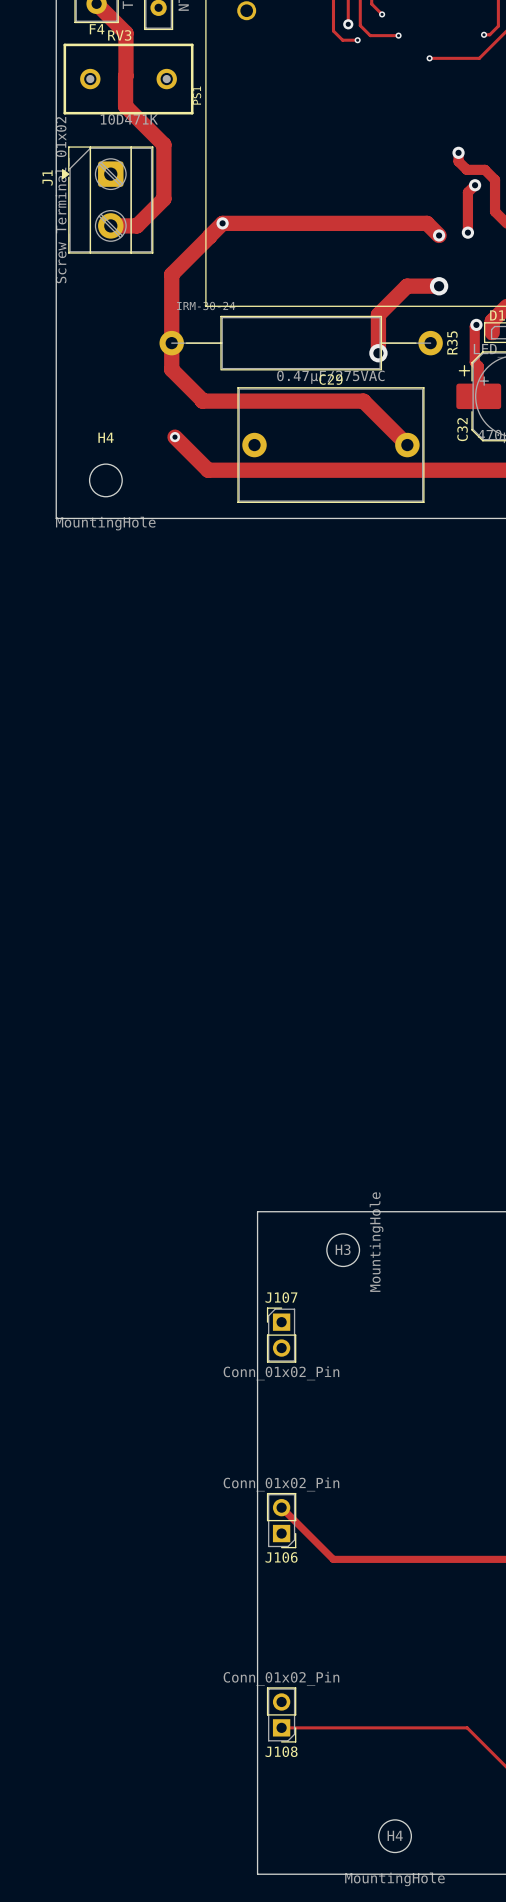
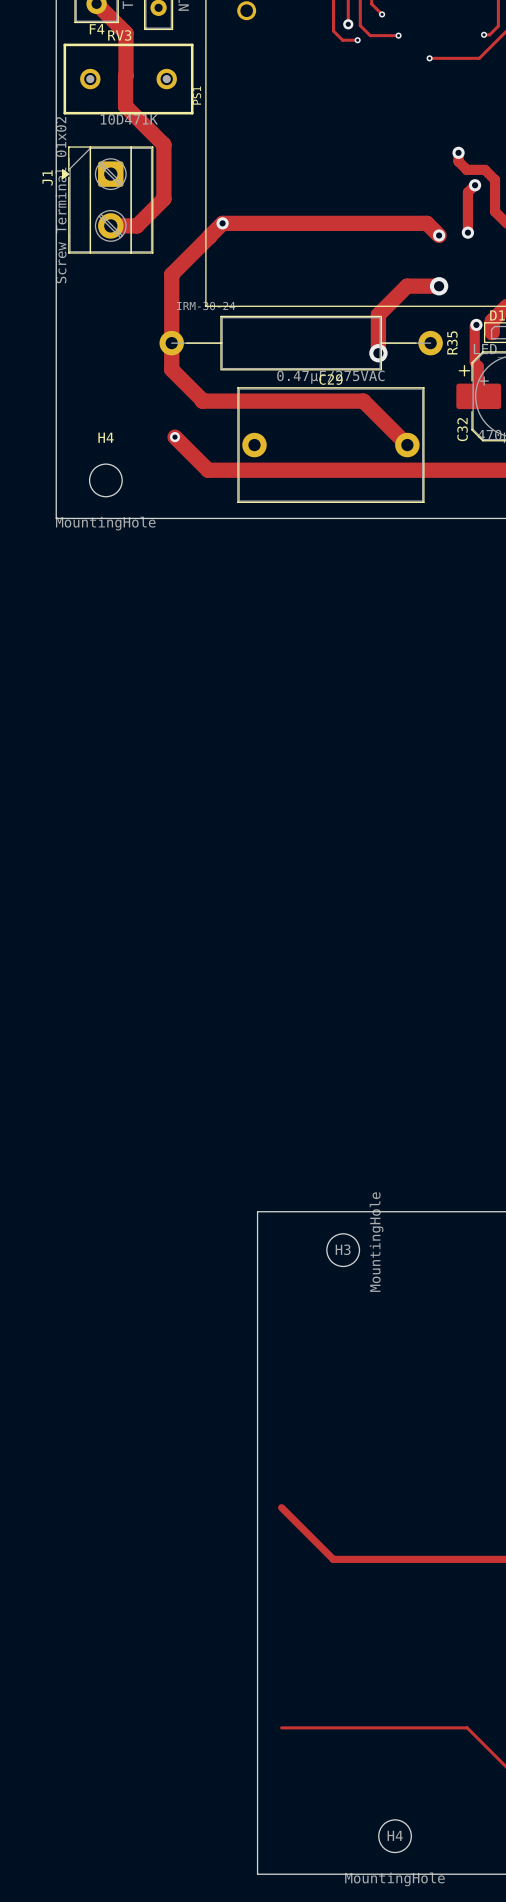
J107: Conn_01x02_Pin (281, 1335) -> none
J106: Conn_01x02_Pin (281, 1520) -> none
J108: Conn_01x02_Pin (281, 1714) -> none

